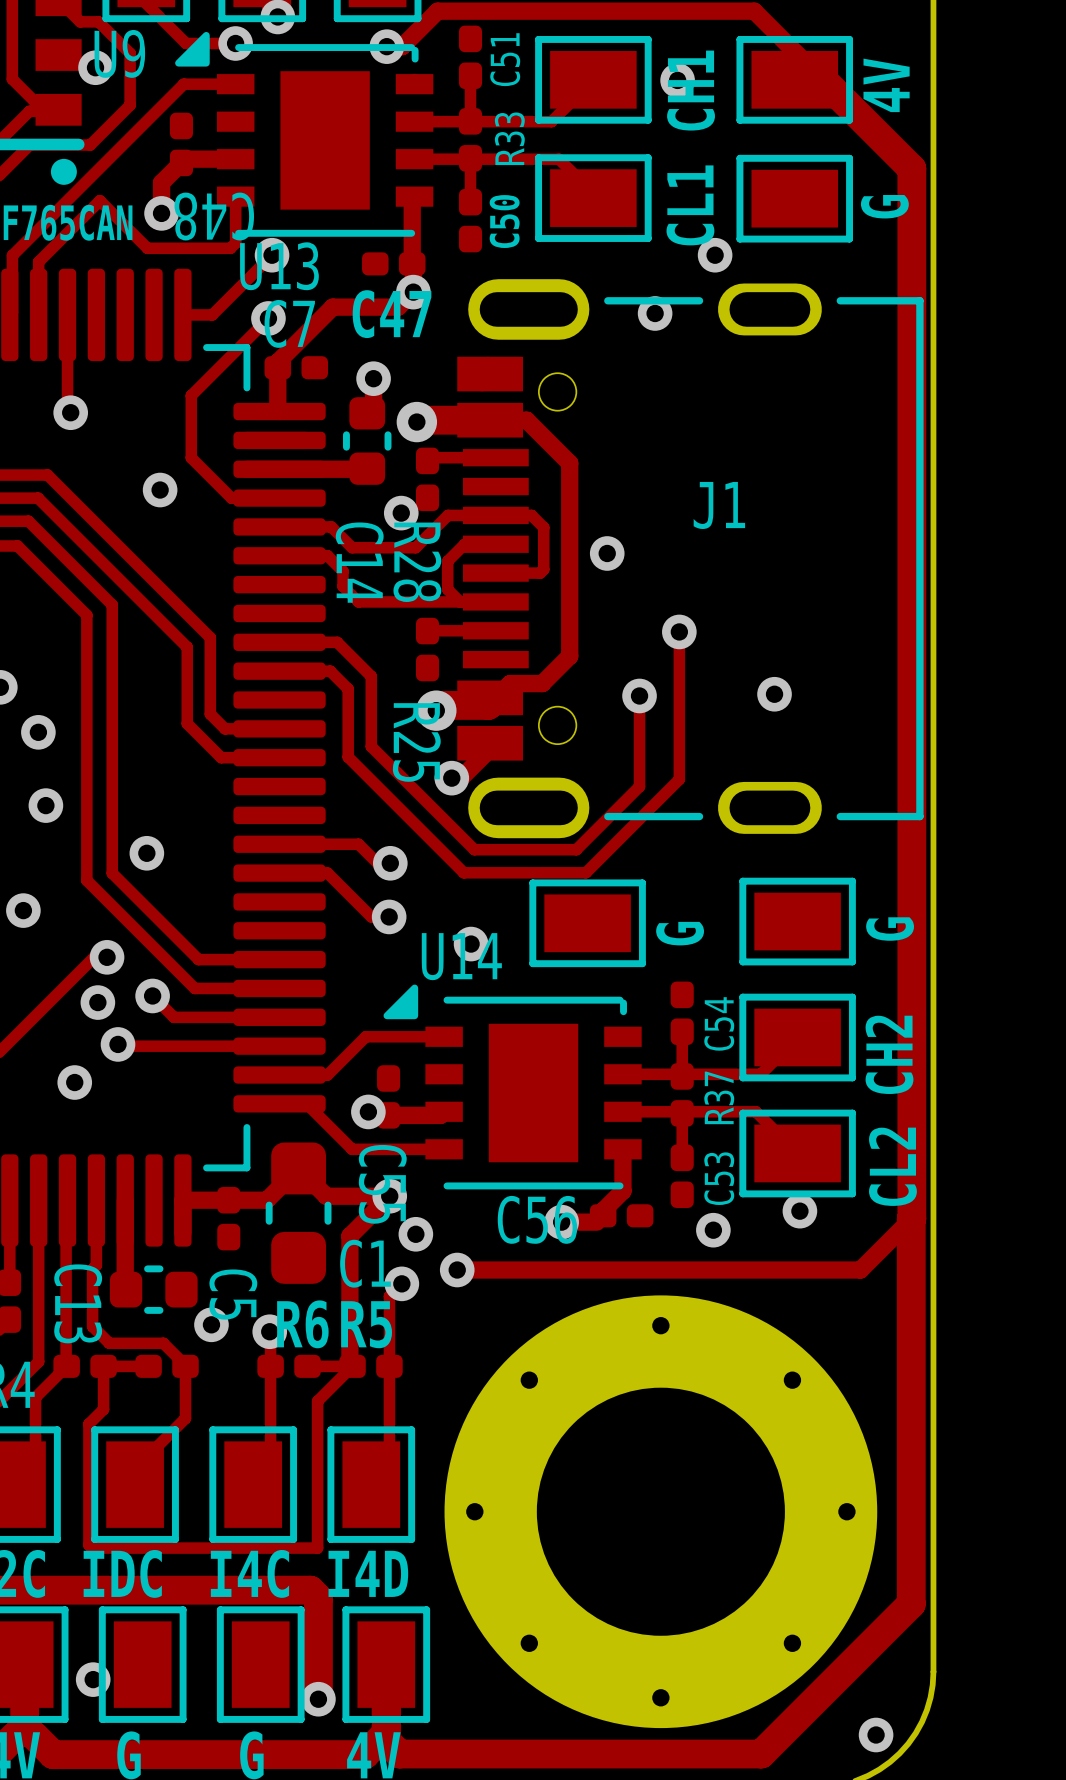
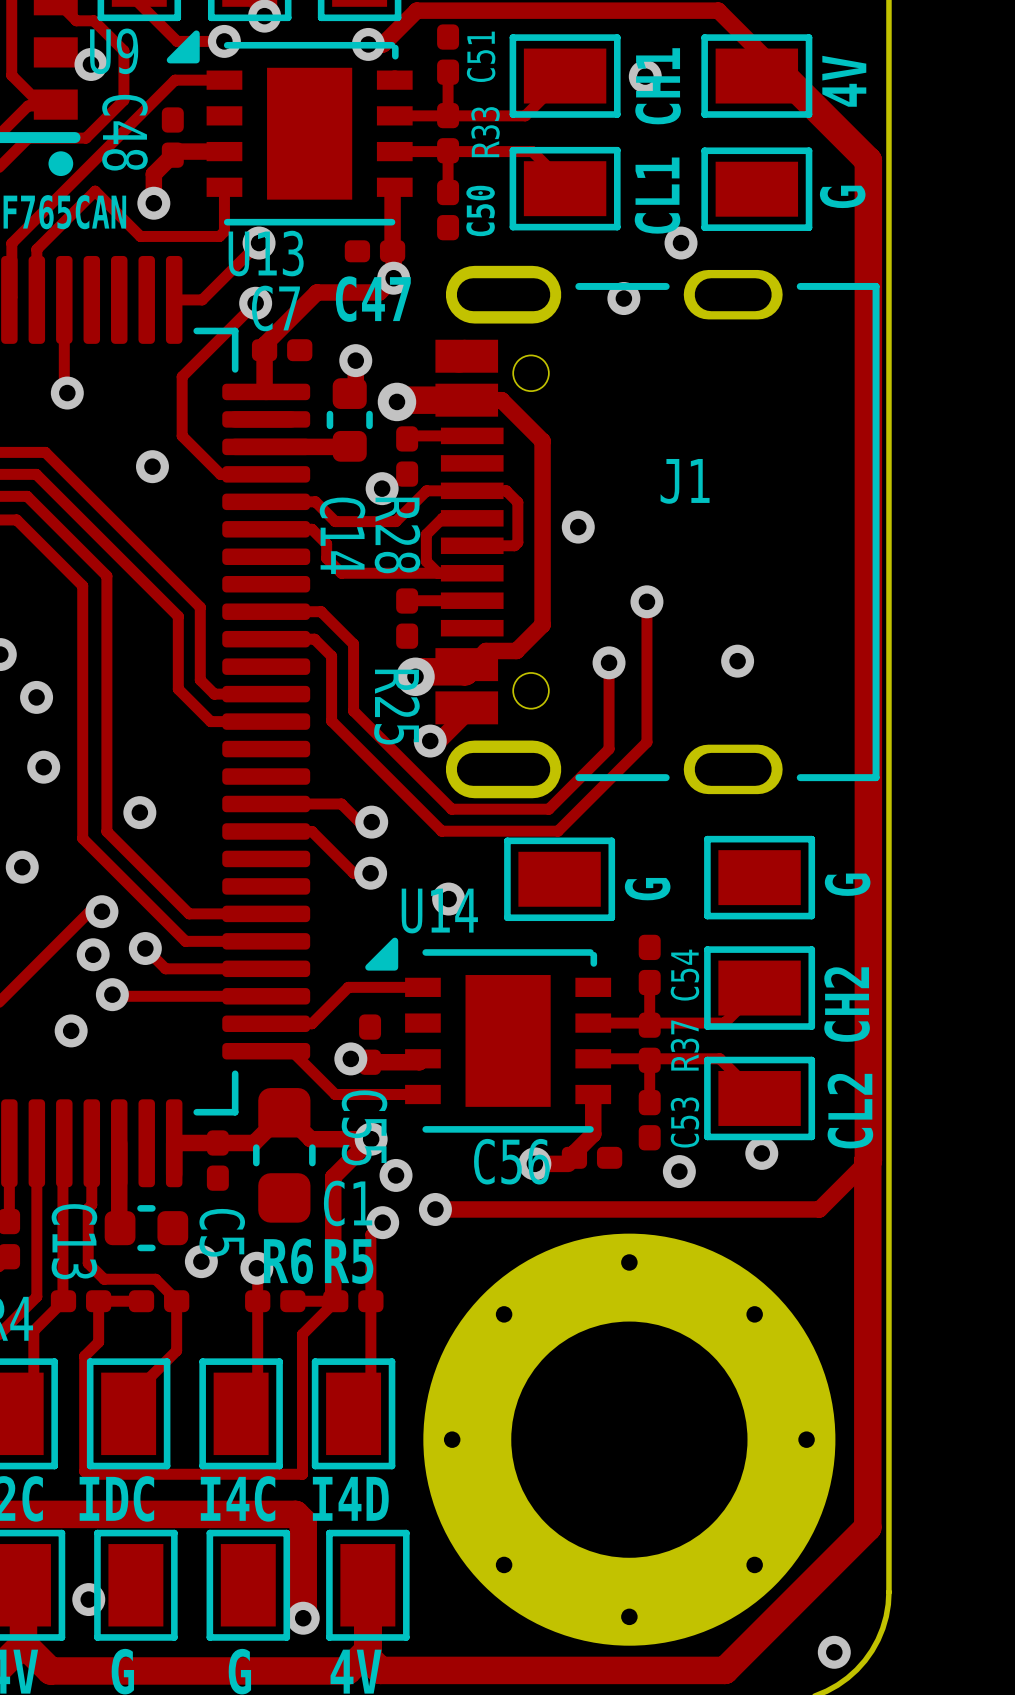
C48 name rotation: 0° (214, 216) -> 90° counterclockwise (124, 132)

